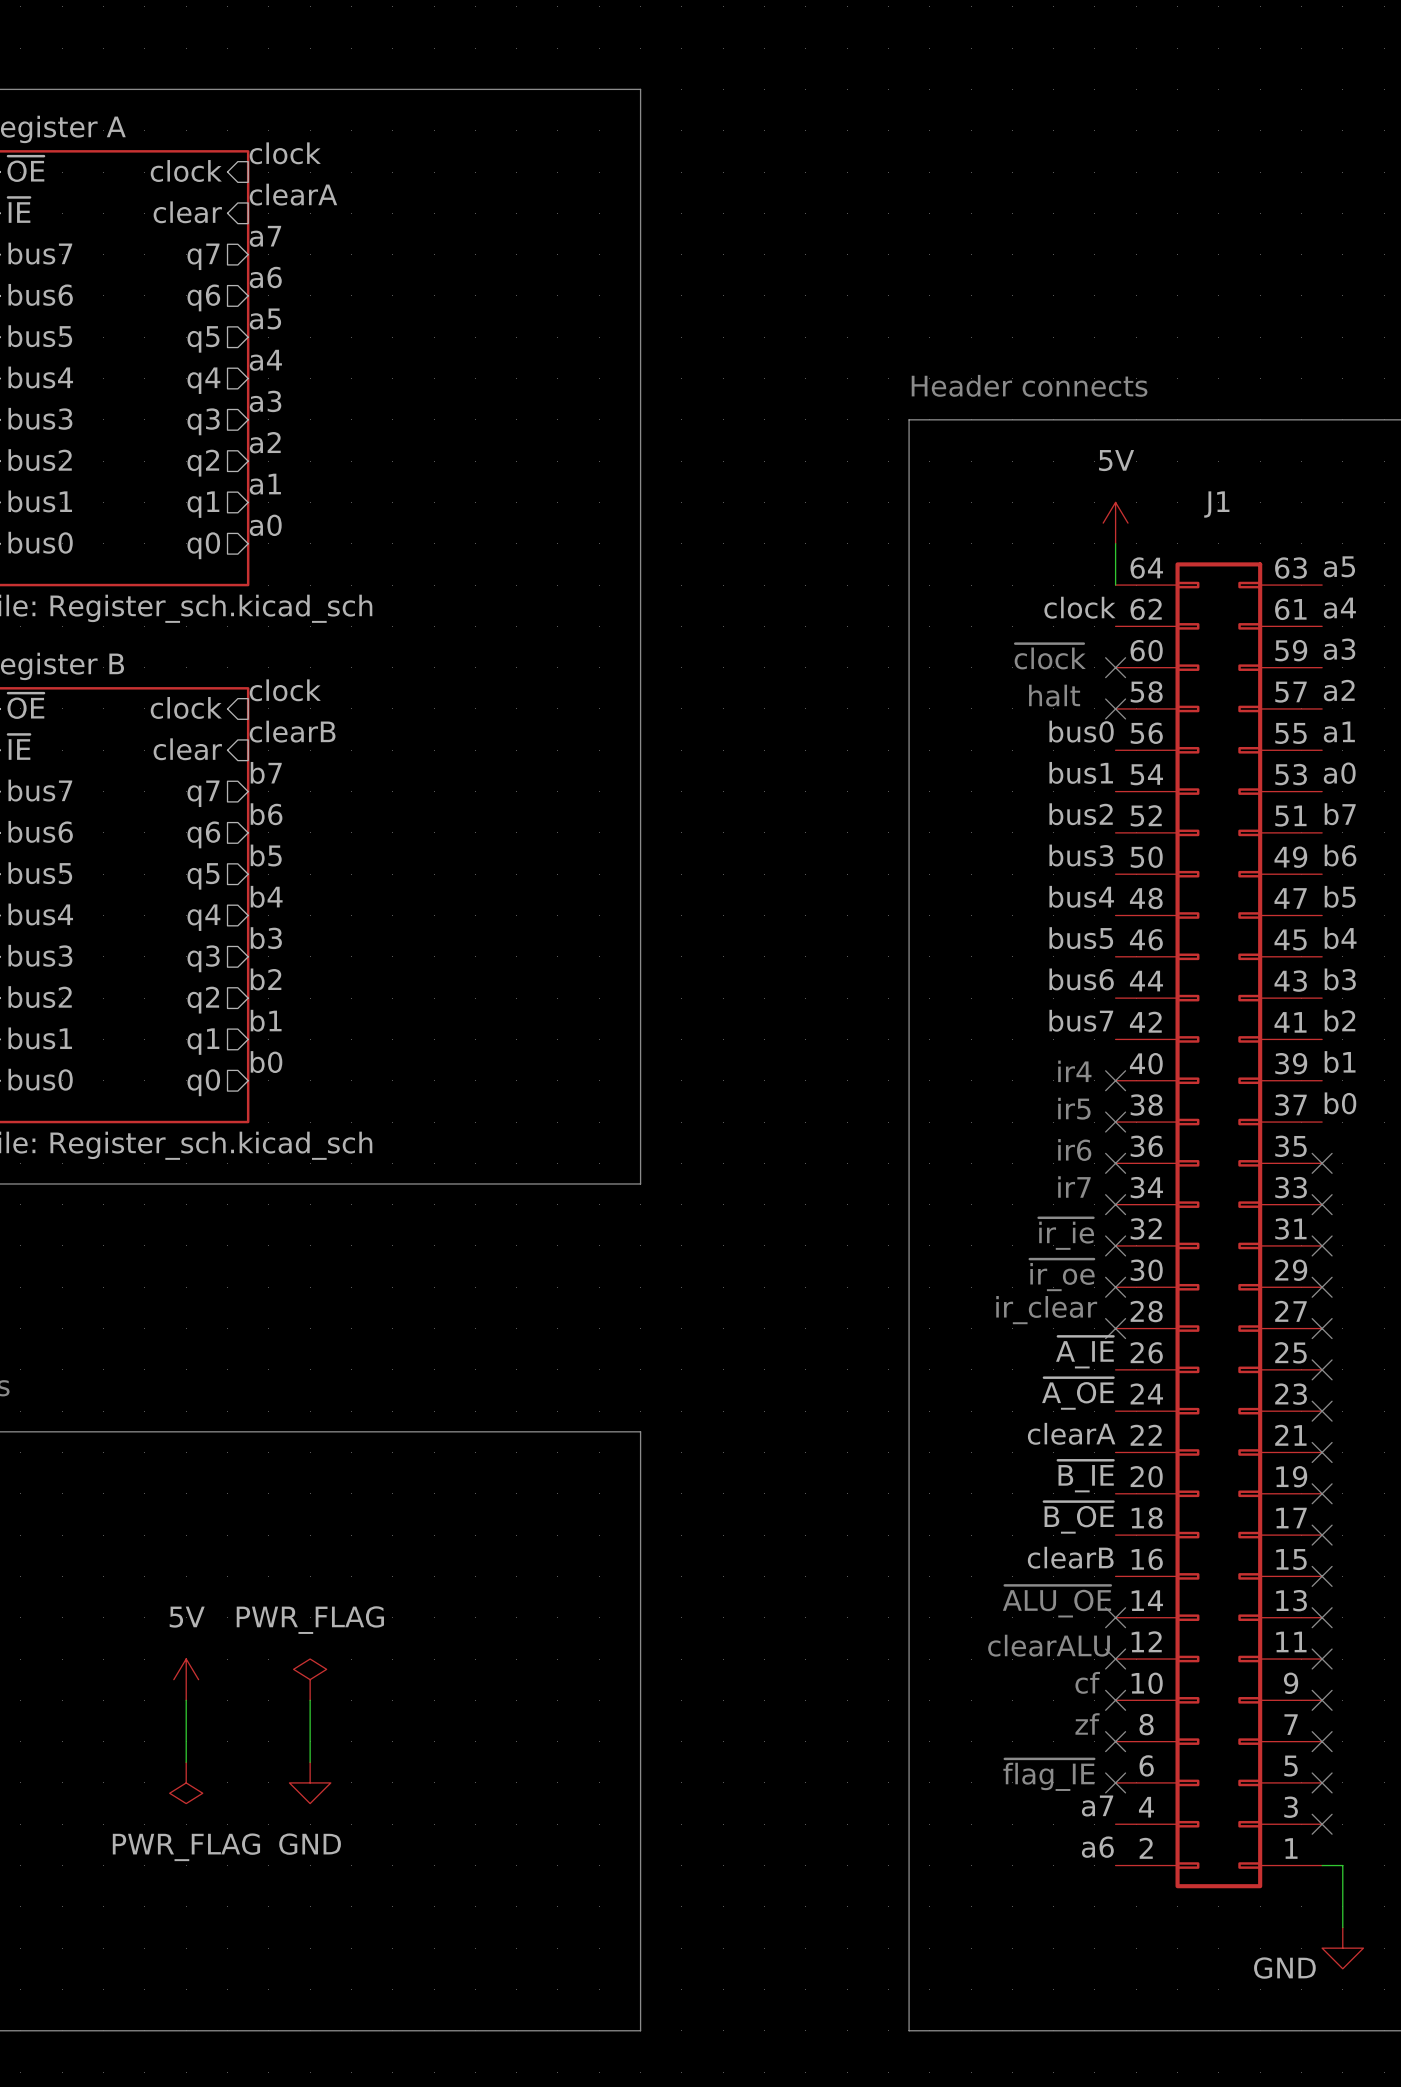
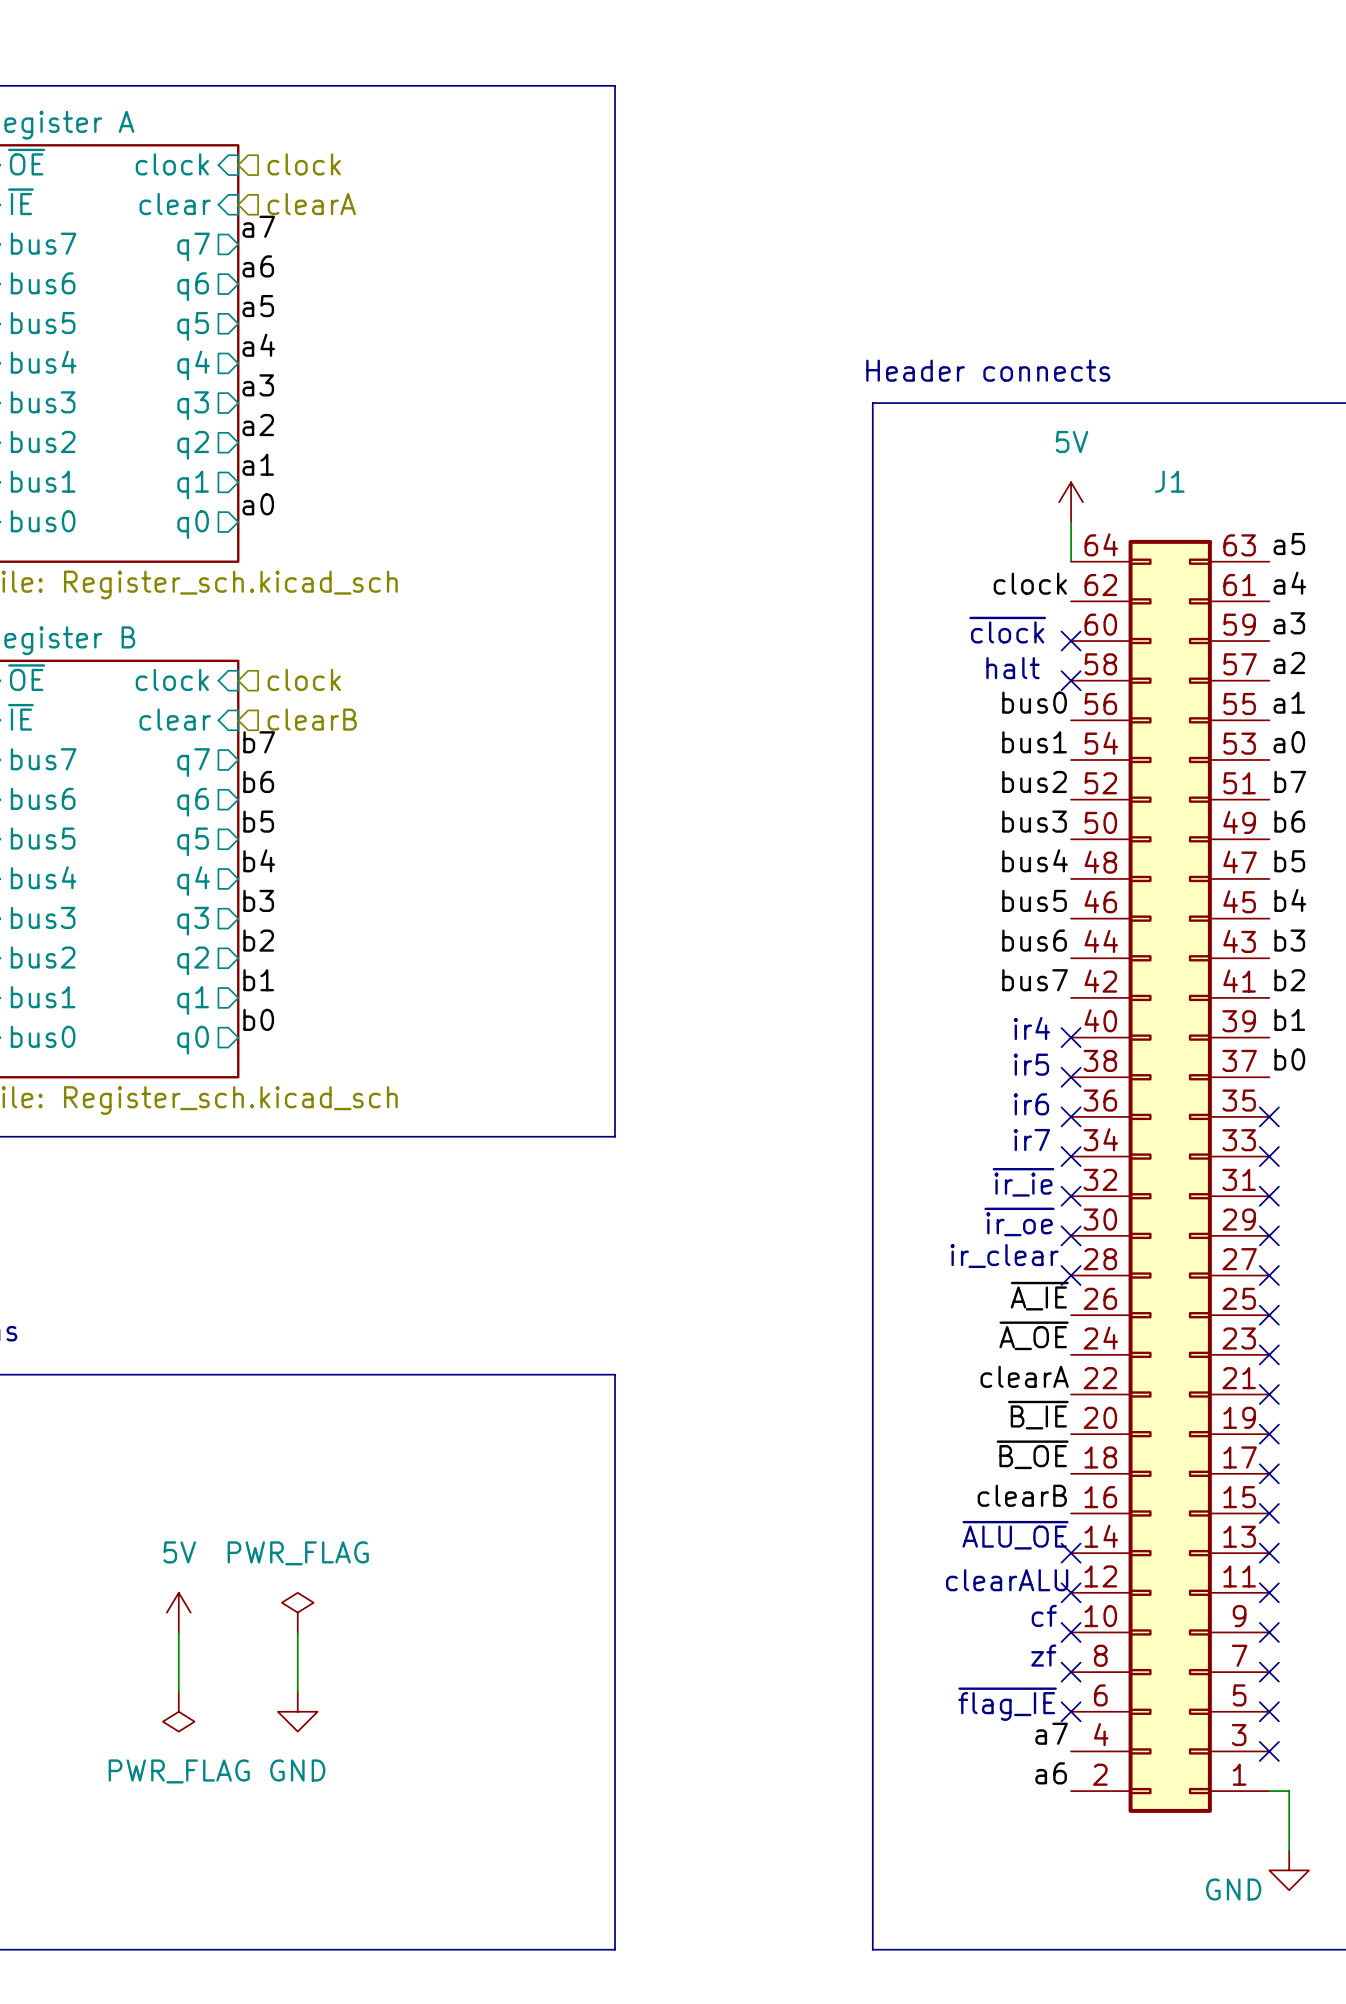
label: clock (285, 153) -> none
hierarchical label: none -> clock (304, 164)
label: clearA (293, 194) -> none
hierarchical label: none -> clearA (311, 204)
label: clock (285, 690) -> none
hierarchical label: none -> clock (304, 679)
label: clearB (292, 731) -> none
hierarchical label: none -> clearB (312, 719)

